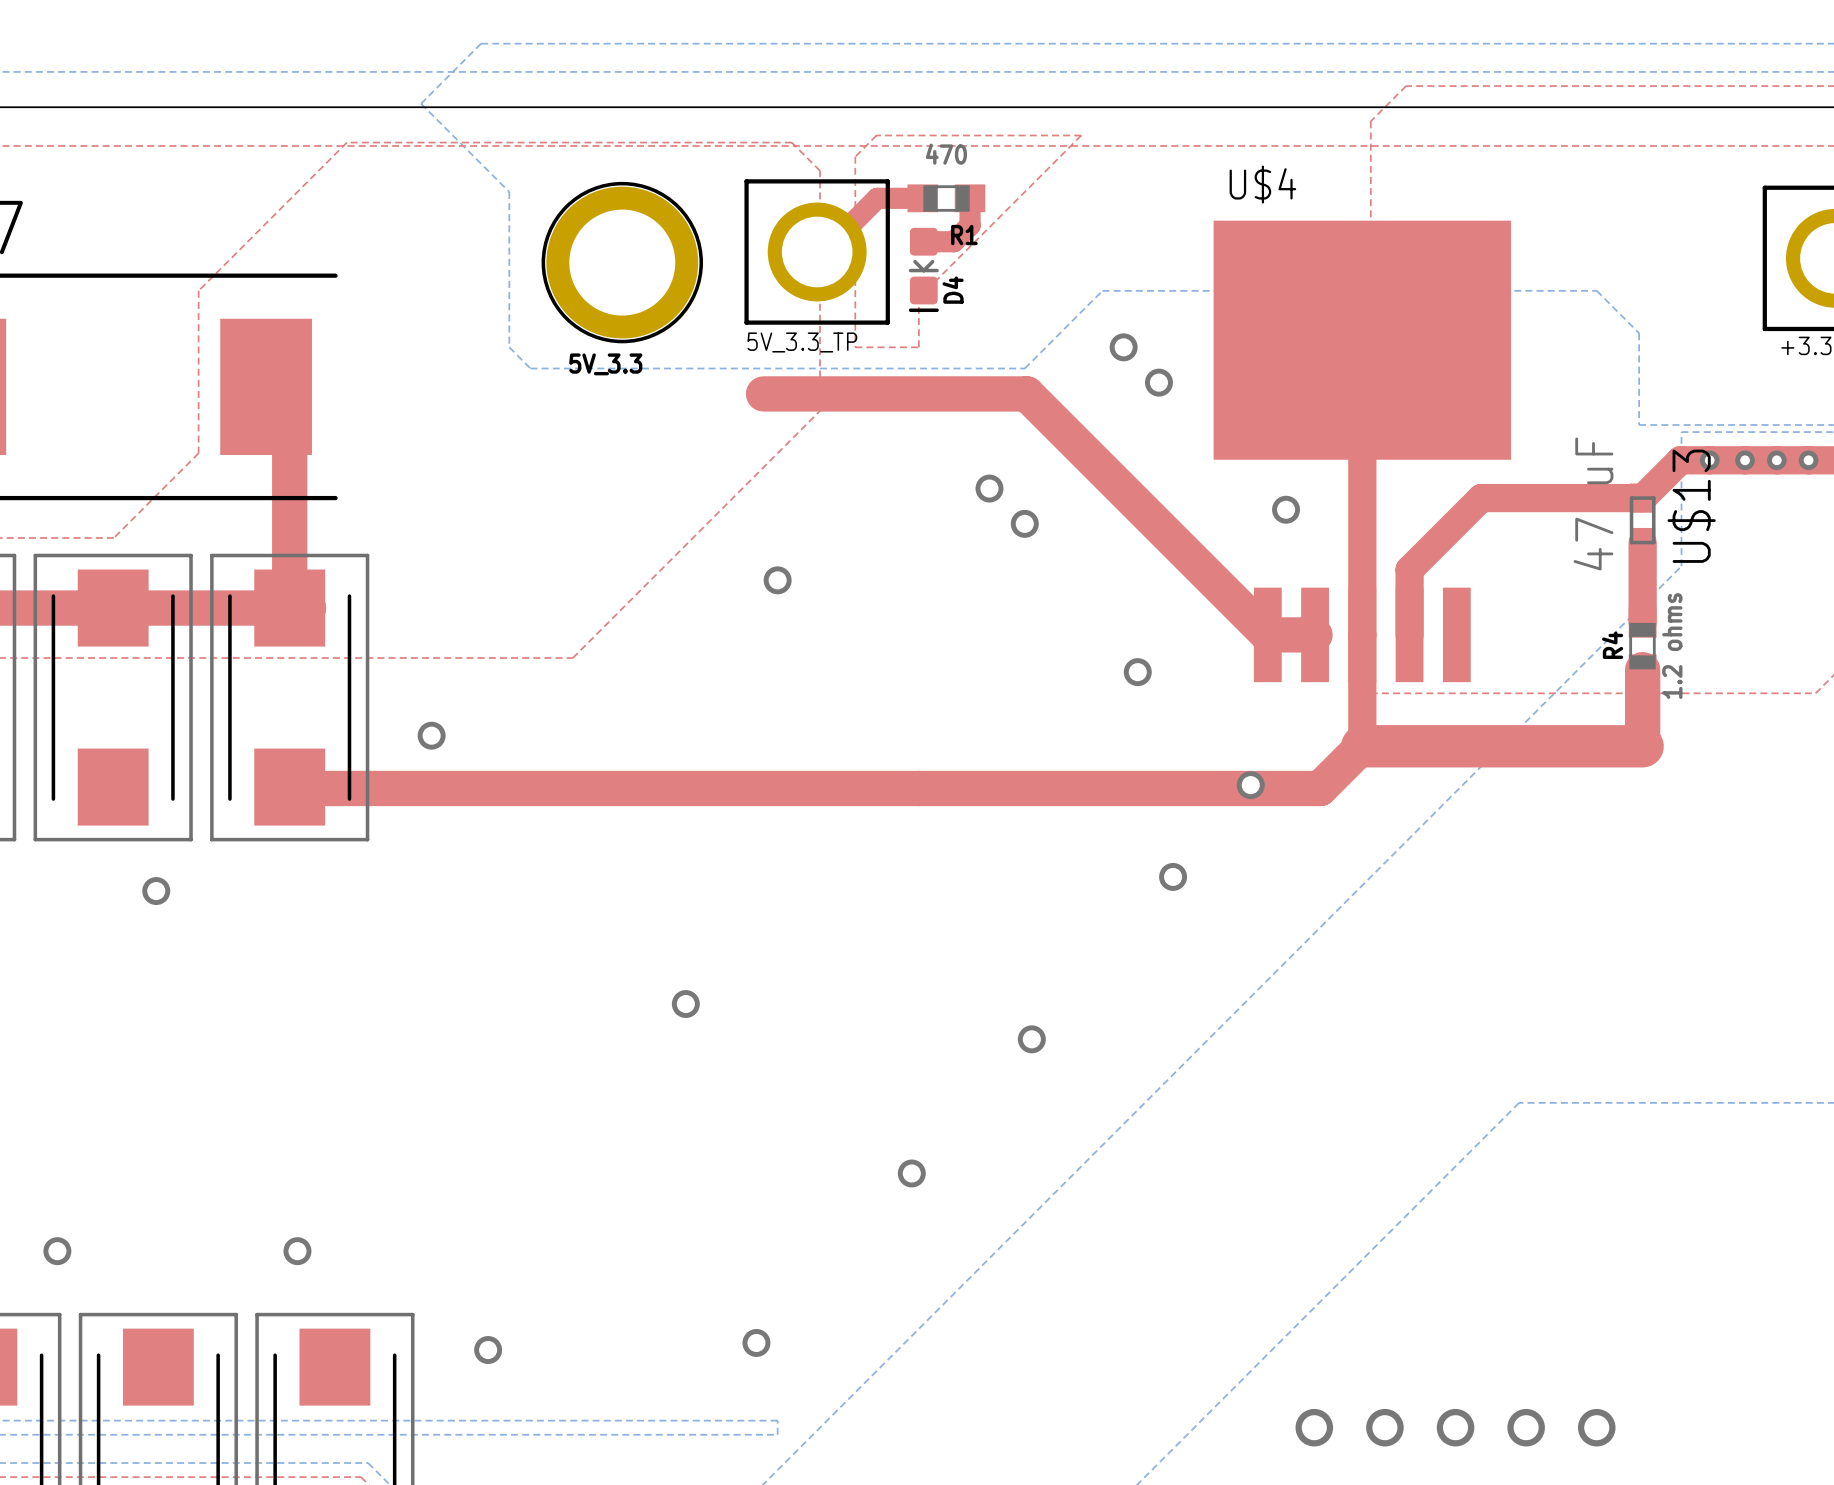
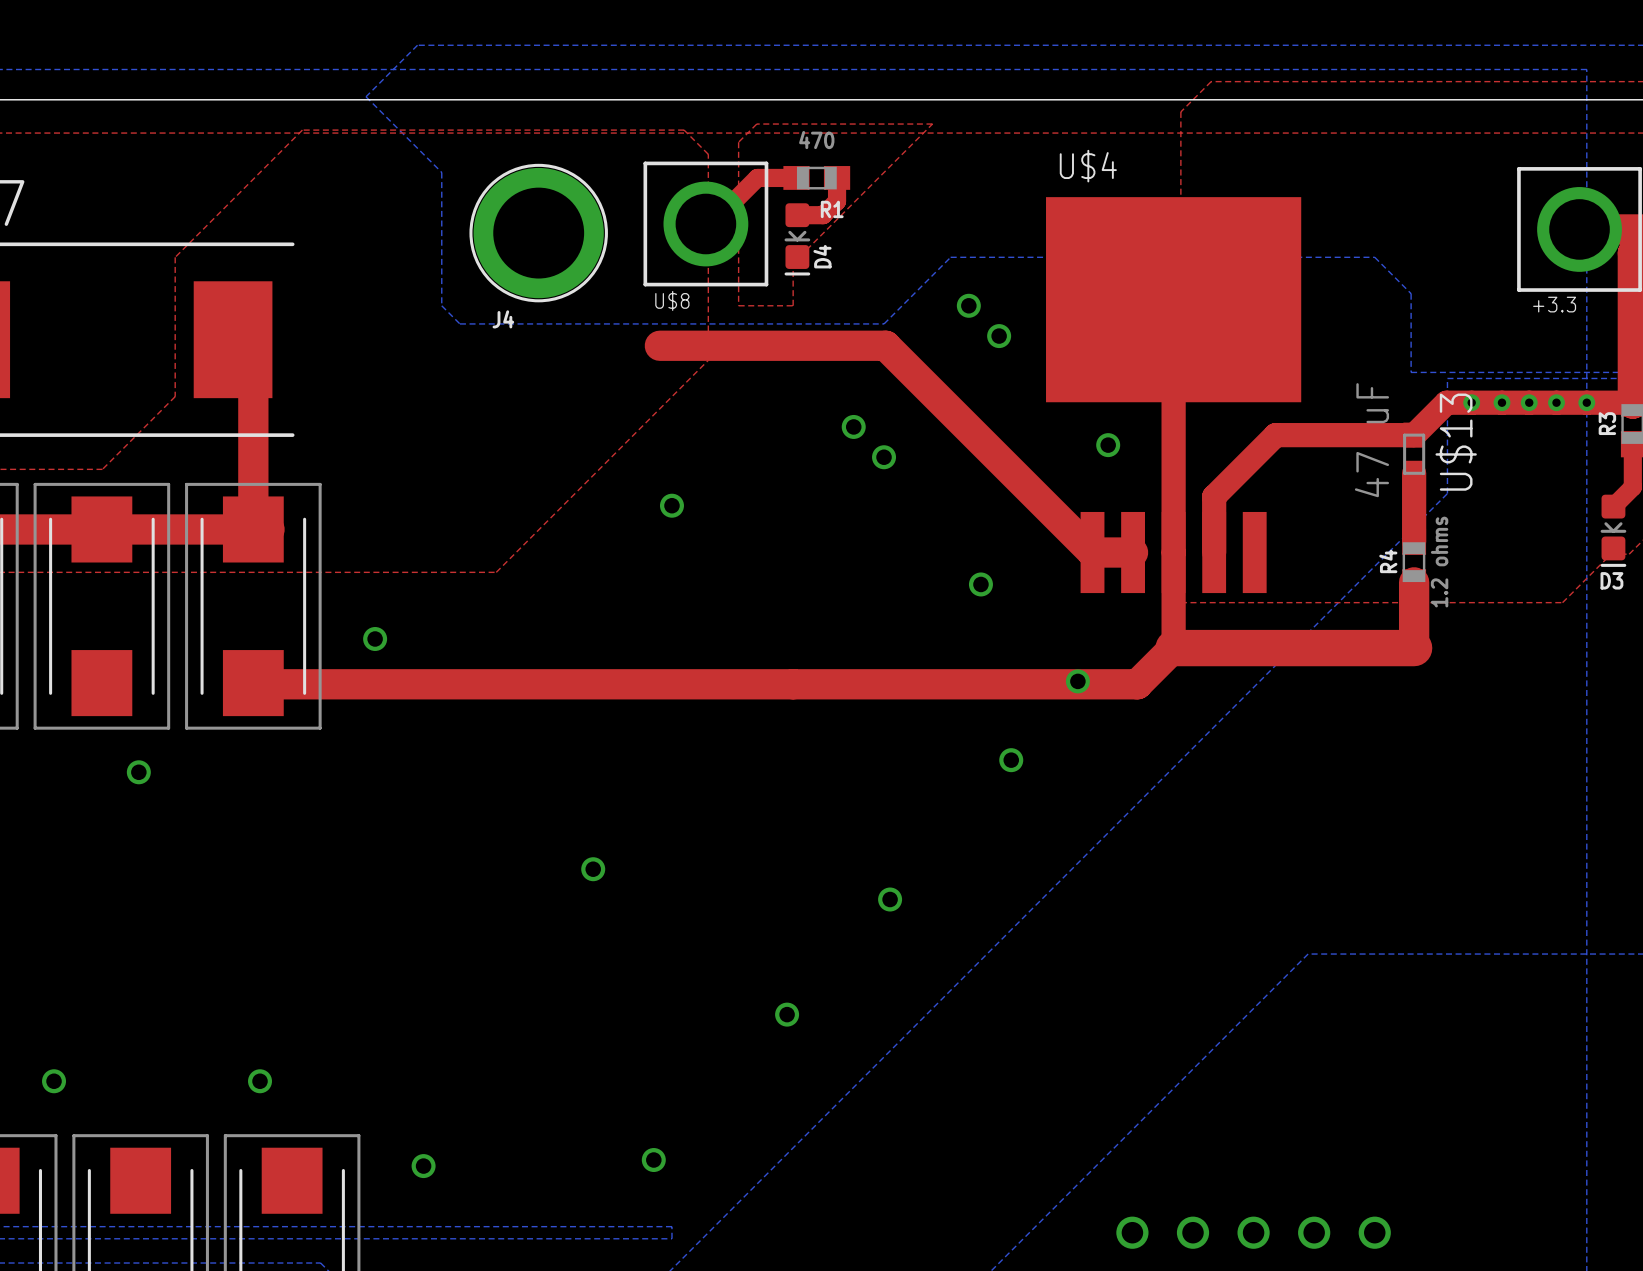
5V_3.3_TP name: 5V_3.3_TP (802, 342) -> U$8 (672, 300)
5V_3.3 name: 5V_3.3 (605, 364) -> J4 (503, 319)

